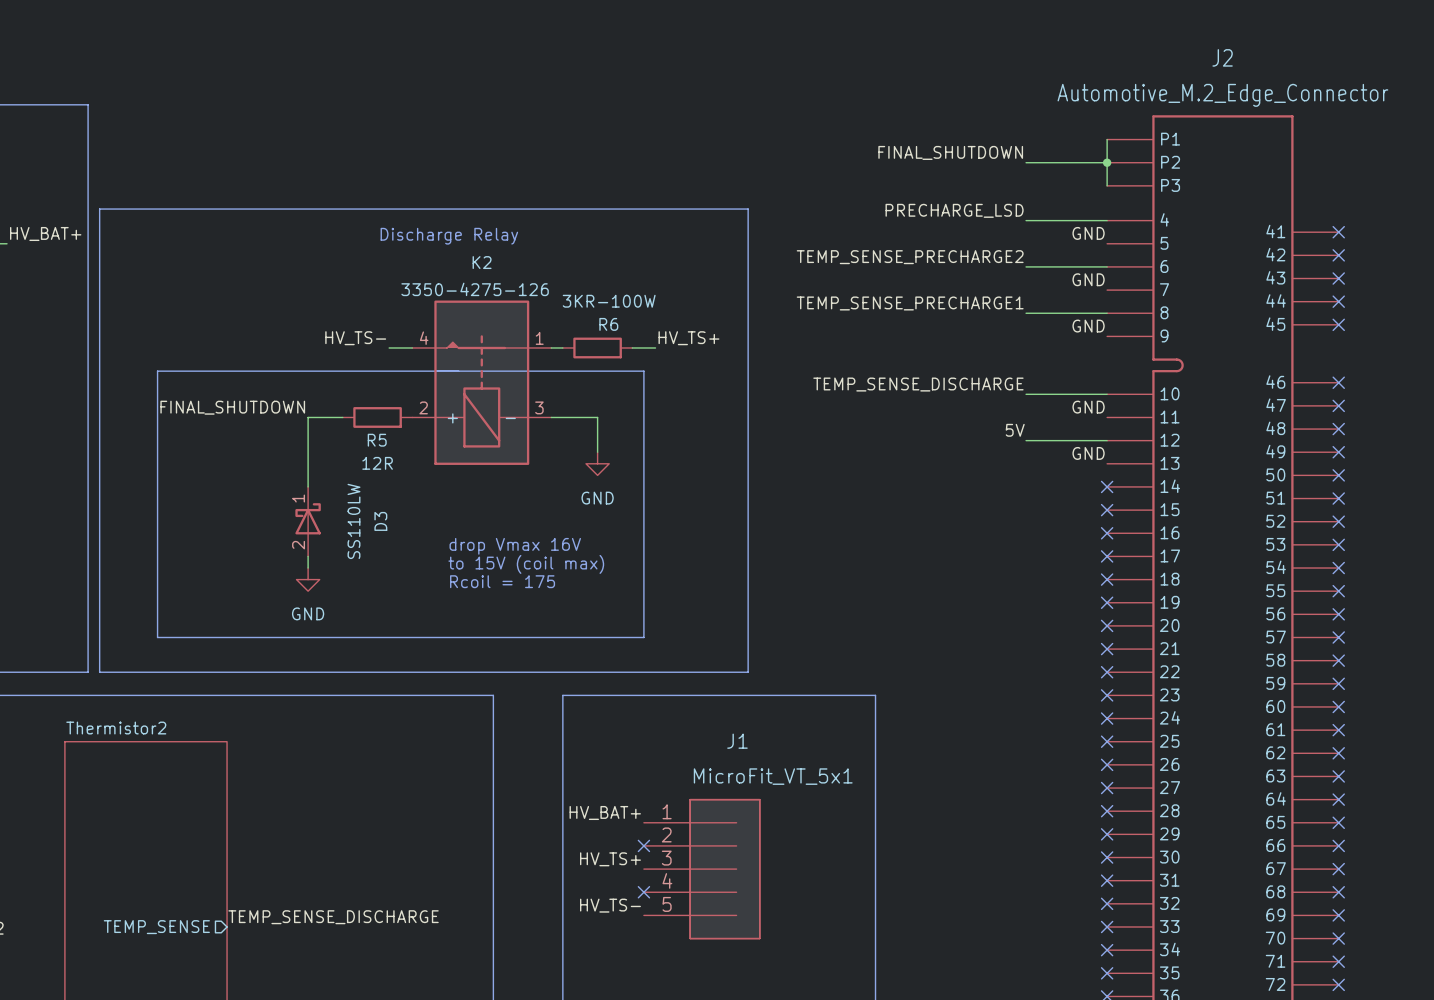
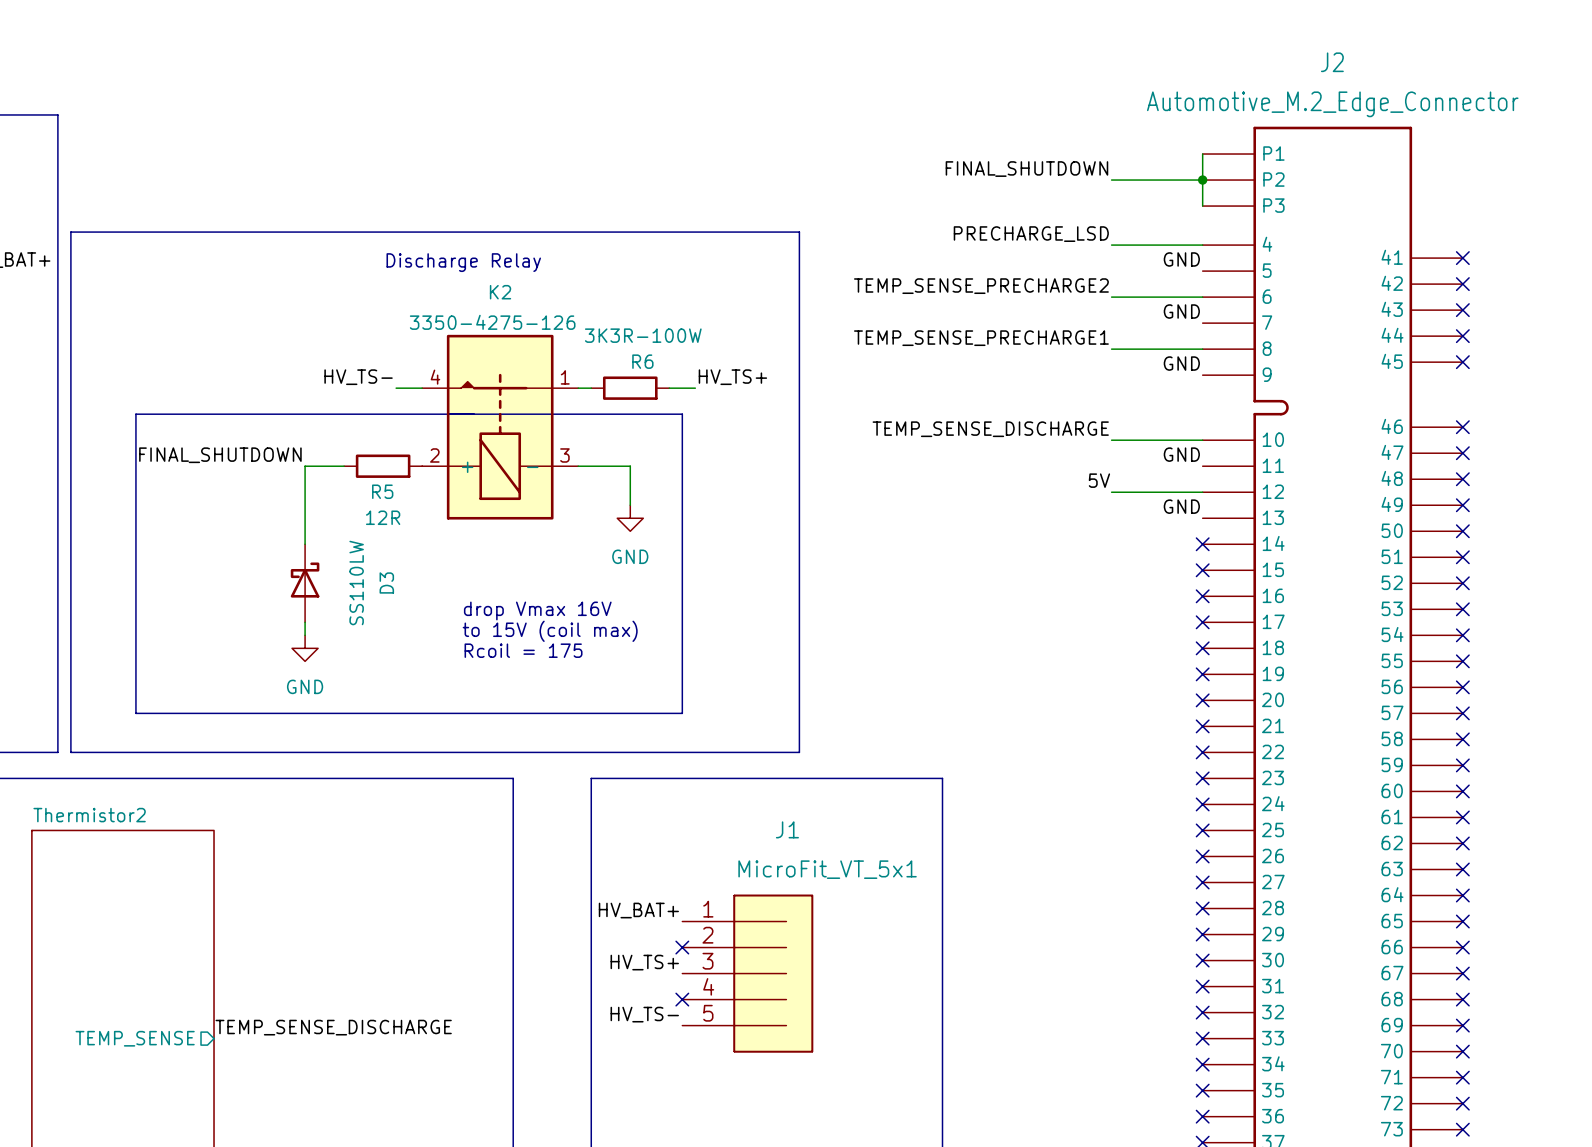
R6 value: 3KR-100W (609, 301) -> 3K3R-100W (643, 335)
D3 pin number: 1 (298, 498) -> none
D3 pin number: 2 (298, 545) -> none

